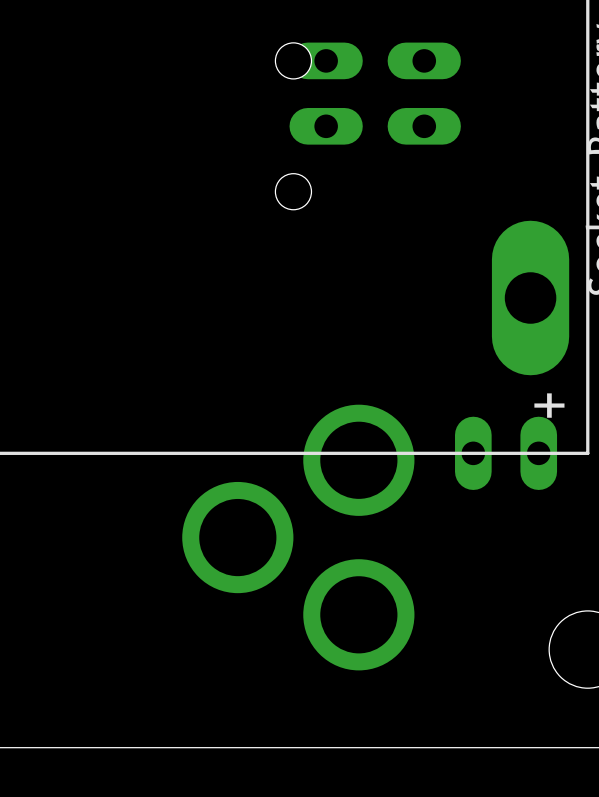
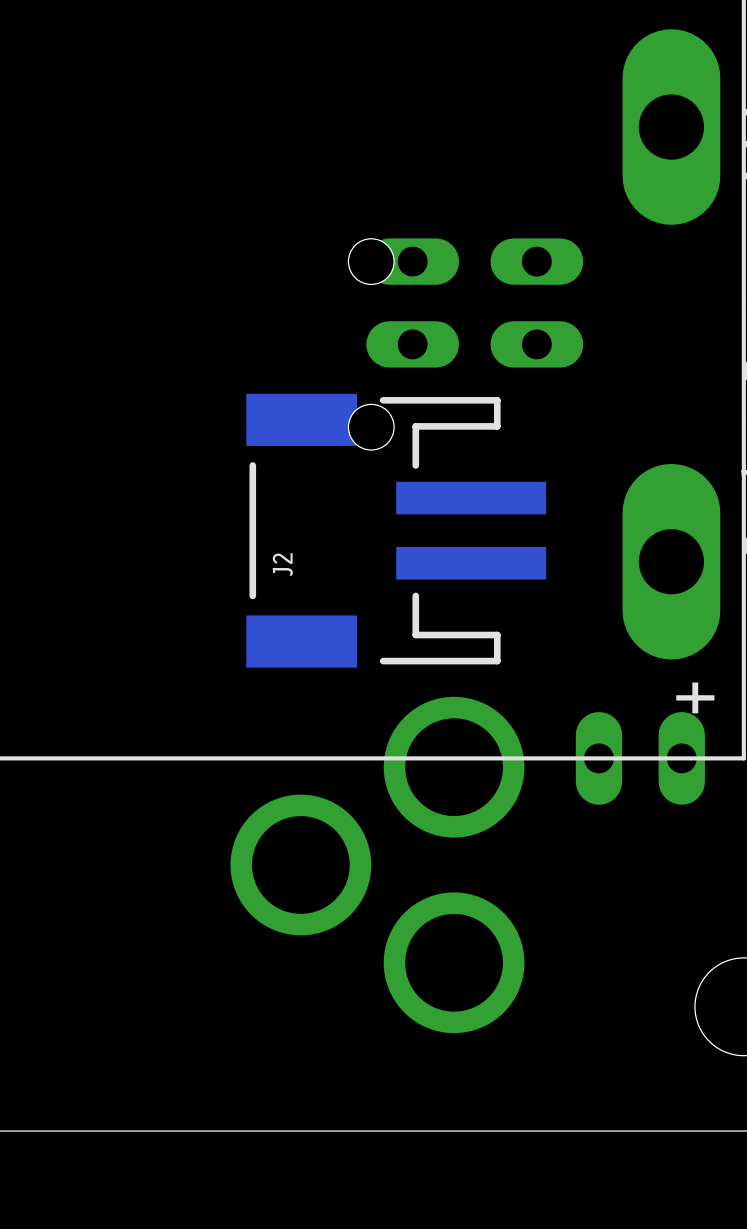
J2: none -> (396, 530)

